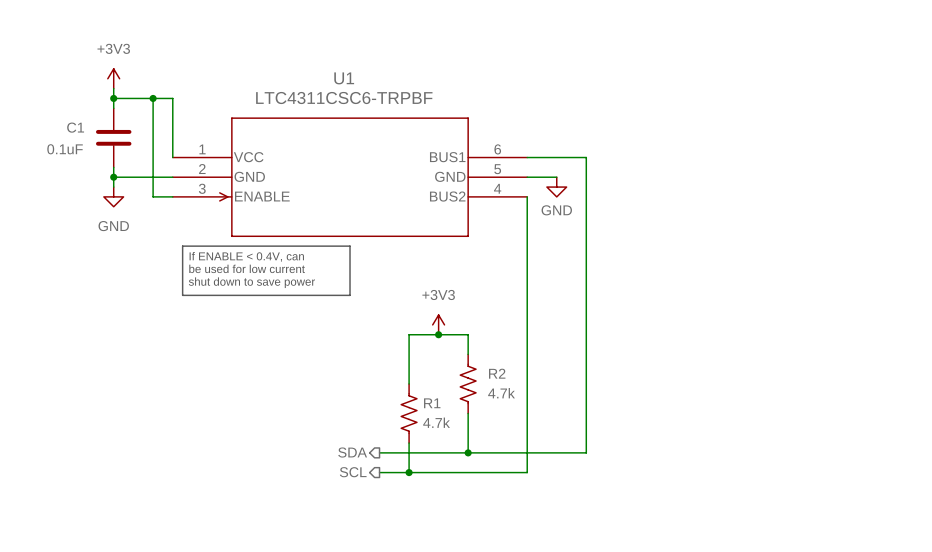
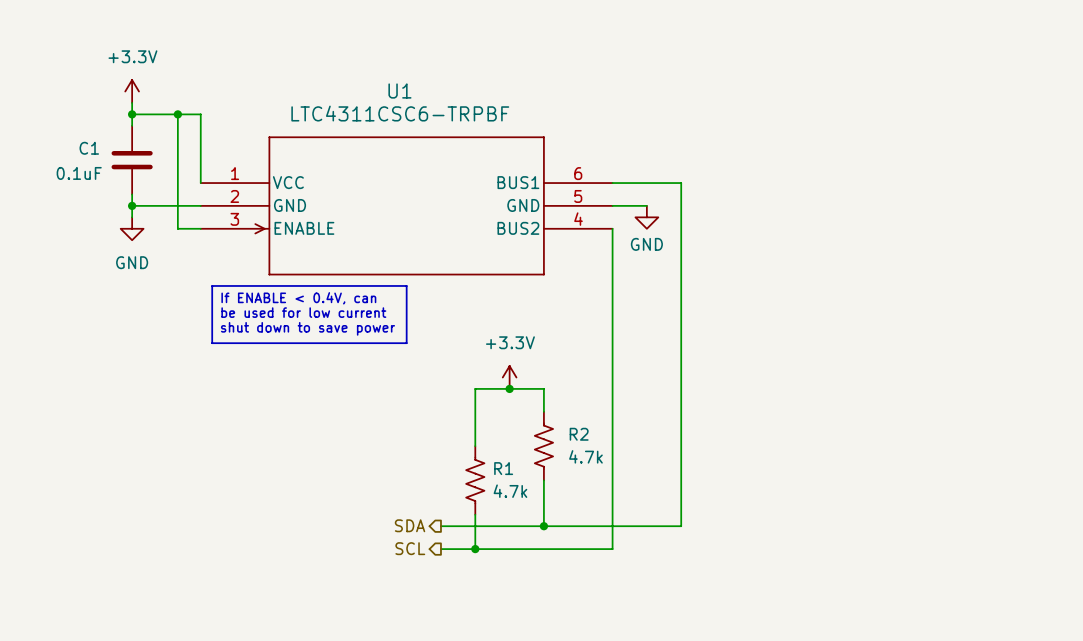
power symbol: +3V3 (113, 78) -> +3.3V (132, 91)
power symbol: +3V3 (438, 324) -> +3.3V (509, 377)

